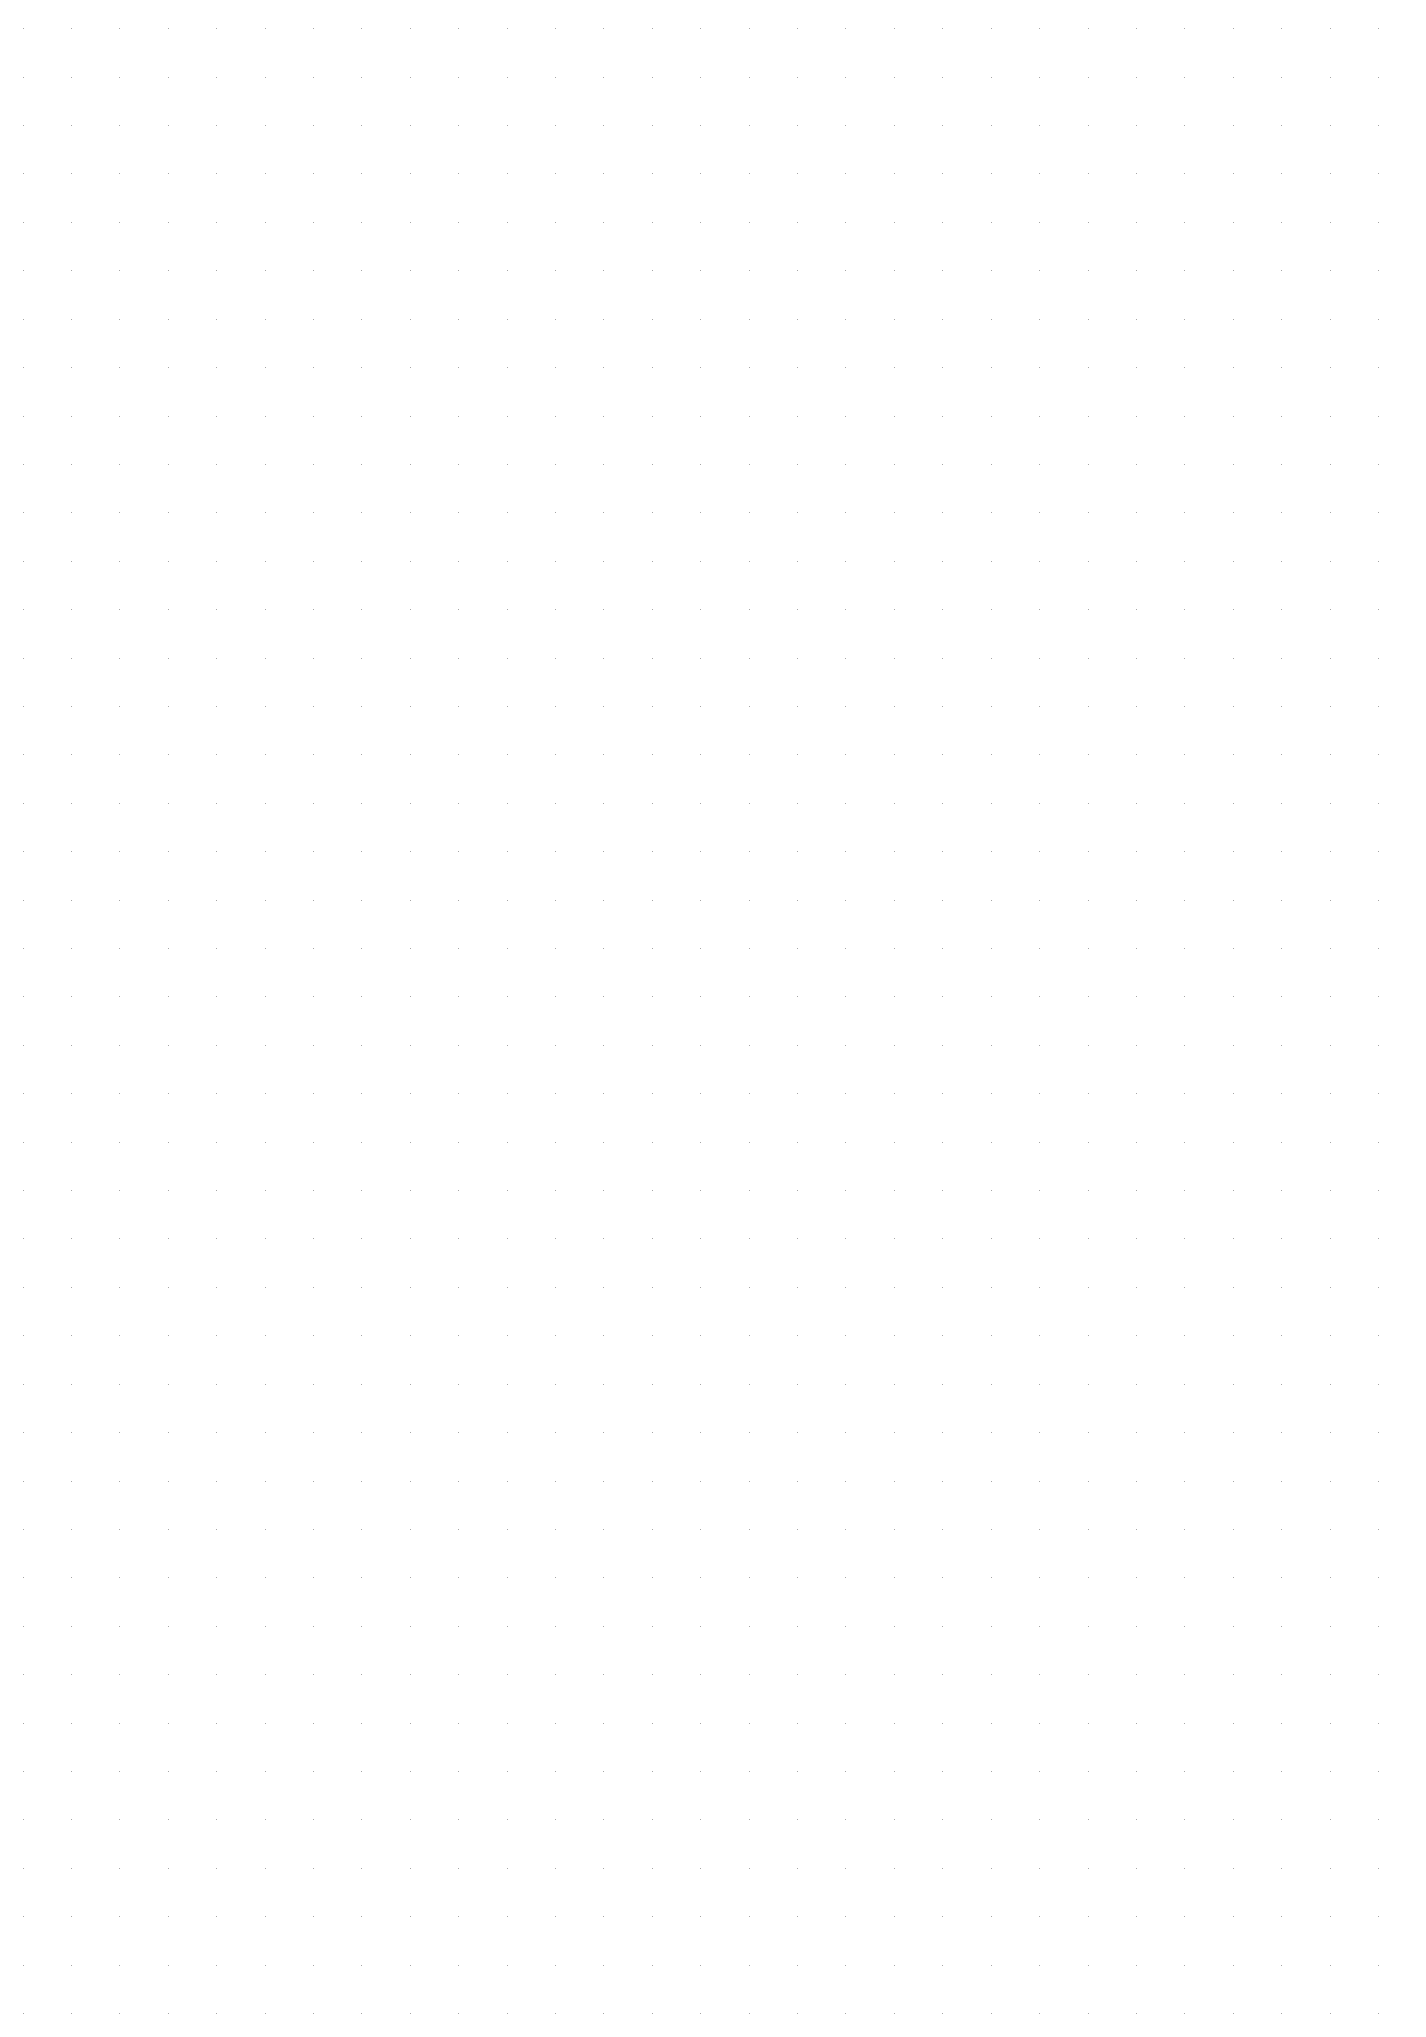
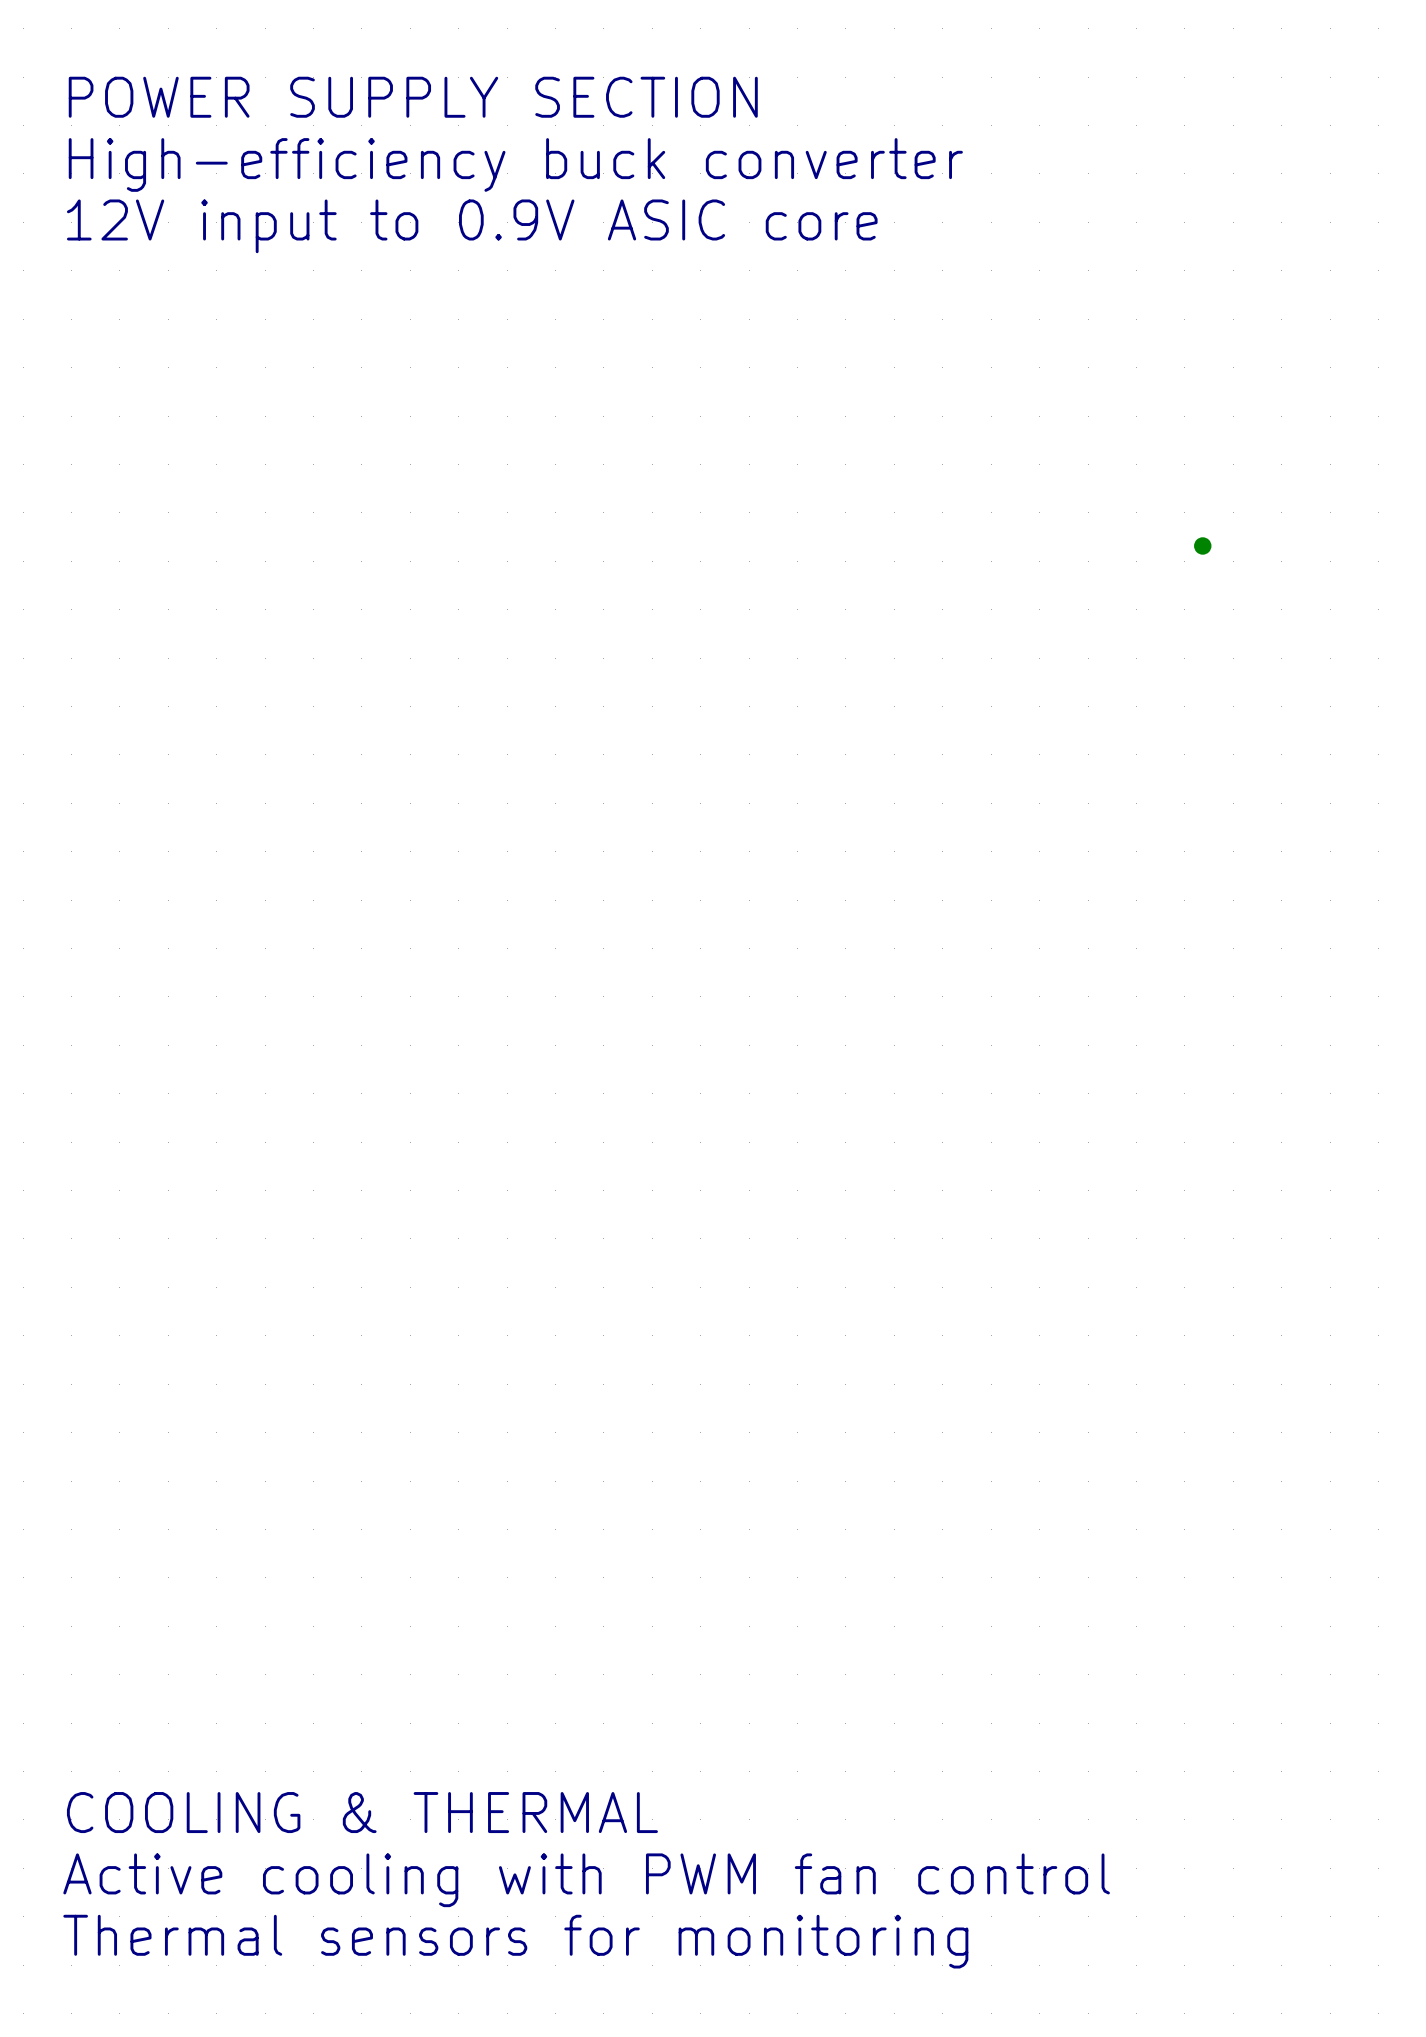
text: none -> POWER SUPPLY SECTION (413, 97)
text: none -> High-efficiency buck converter (515, 164)
text: none -> 12V input to 0.9V ASIC core (472, 226)
junction: none -> (1202, 545)
text: none -> COOLING & THERMAL (362, 1812)
text: none -> Active cooling with PWM fan control (586, 1880)
text: none -> Thermal sensors for monitoring (515, 1941)

